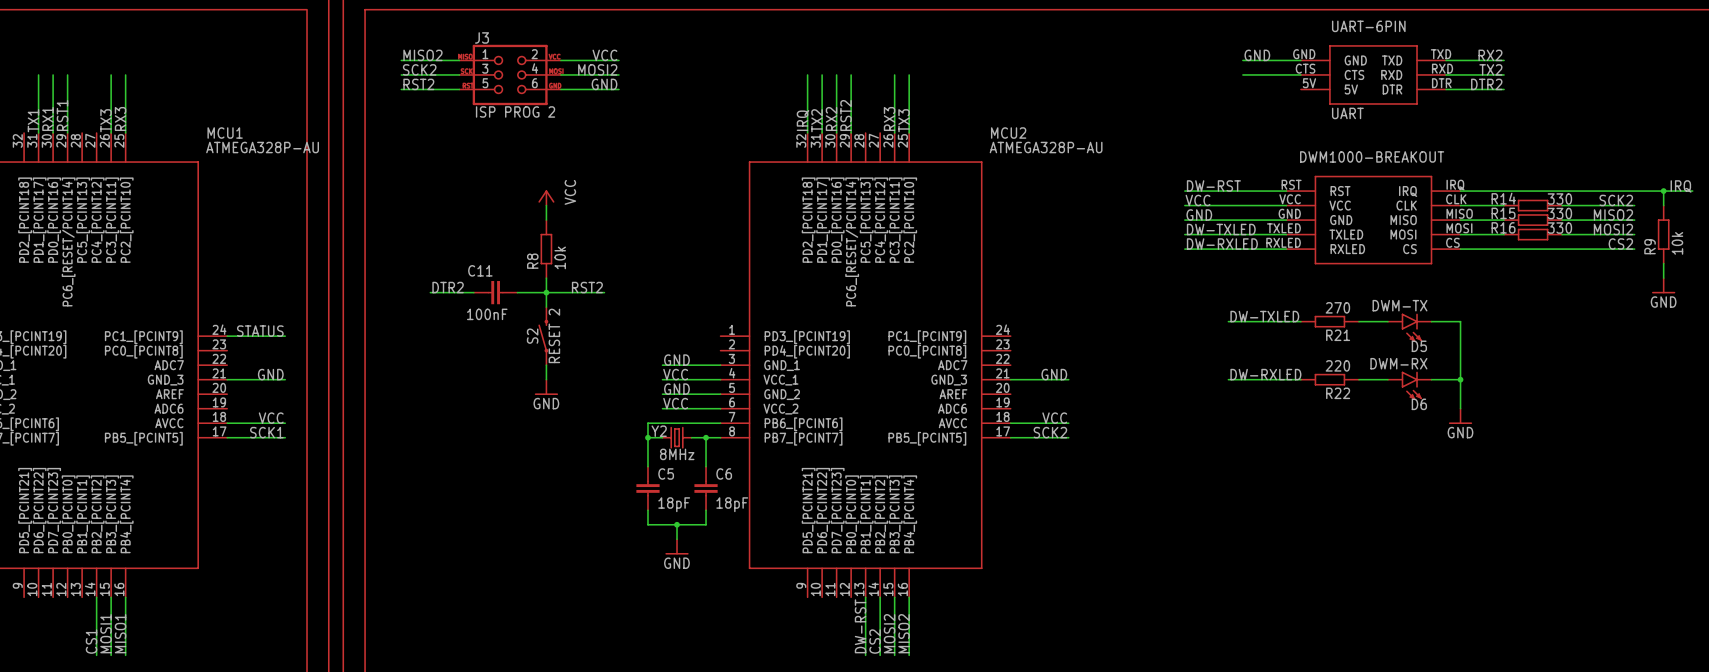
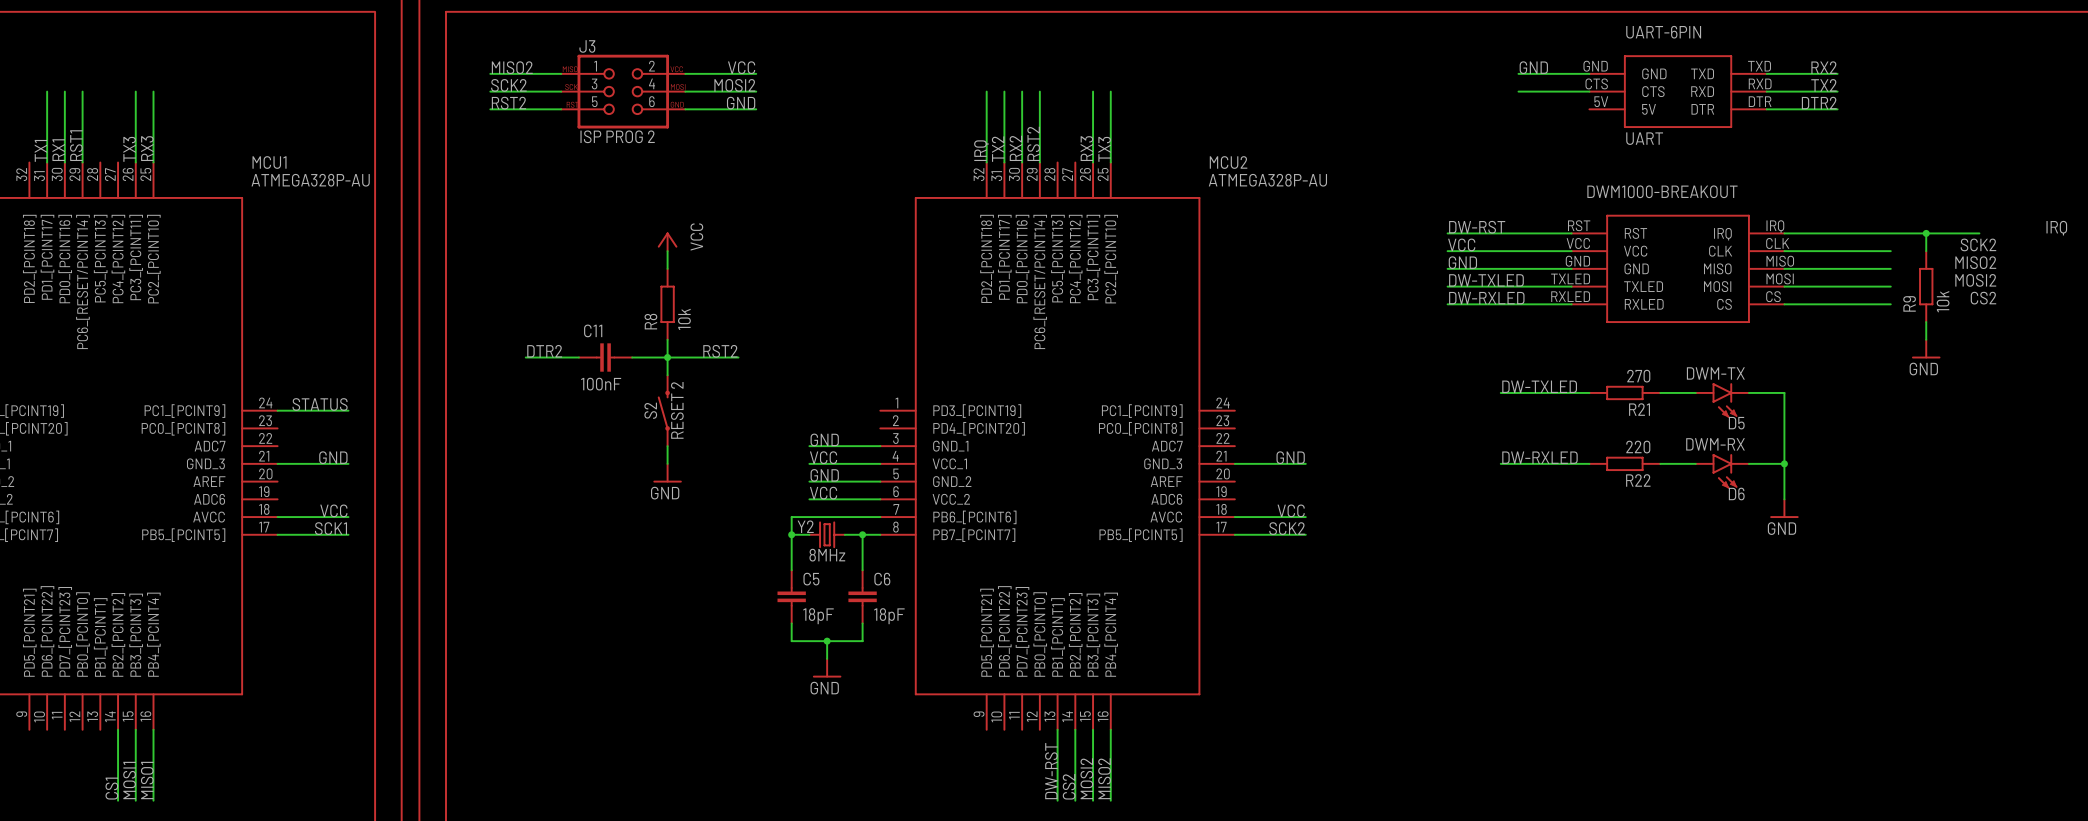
junction: none -> (1926, 233)
wire: (1620, 191) (1692, 191) -> none
wire: (1663, 191) (1663, 205) -> (1926, 233) (1926, 251)
junction: (1663, 191) -> none
wire: none -> (1837, 251) (1890, 251)
R14: 330 (1533, 205) -> none
wire: (1562, 205) (1634, 205) -> none
wire: none -> (1837, 268) (1890, 268)
R15: 330 (1533, 220) -> none
wire: (1562, 220) (1634, 220) -> none
wire: none -> (1837, 286) (1890, 286)
R16: 330 (1533, 234) -> none
wire: (1562, 234) (1634, 234) -> none
R9 position: (1663, 234) -> (1926, 286)
wire: (1547, 249) (1634, 249) -> none
wire: (1663, 263) (1663, 278) -> (1926, 322) (1926, 339)
power symbol position: GND (1663, 285) -> GND (1926, 349)

